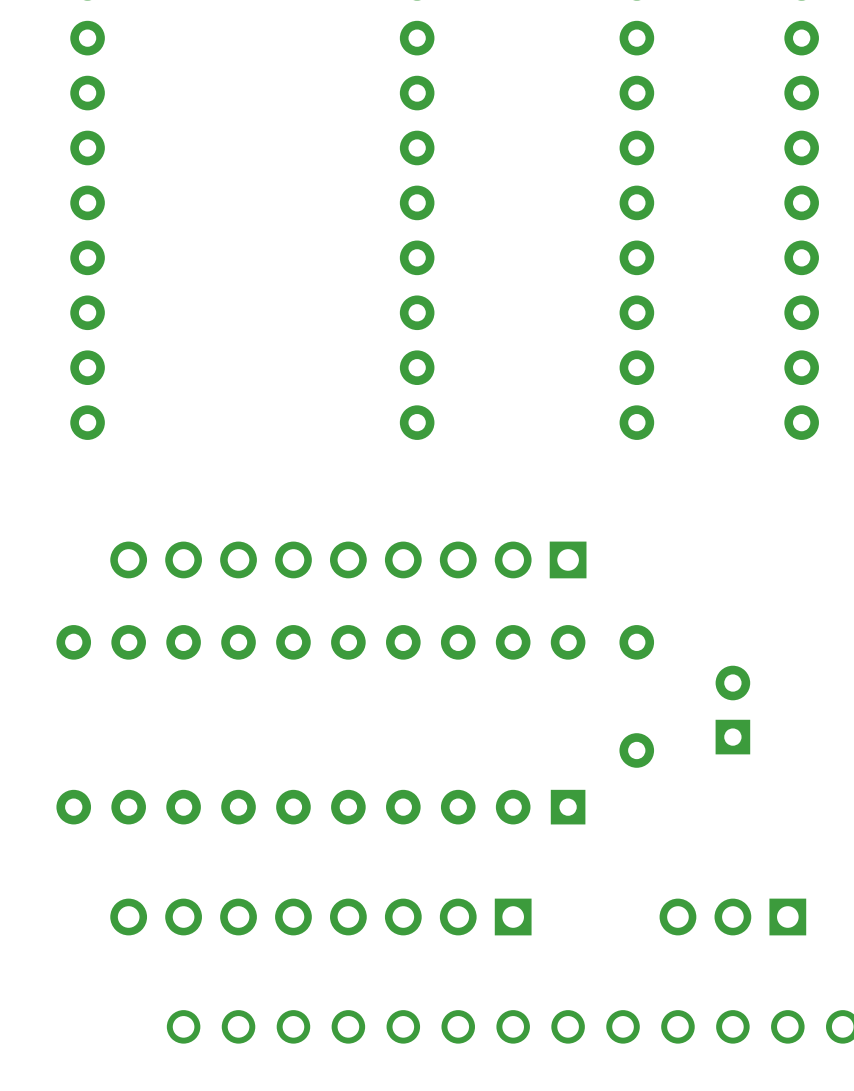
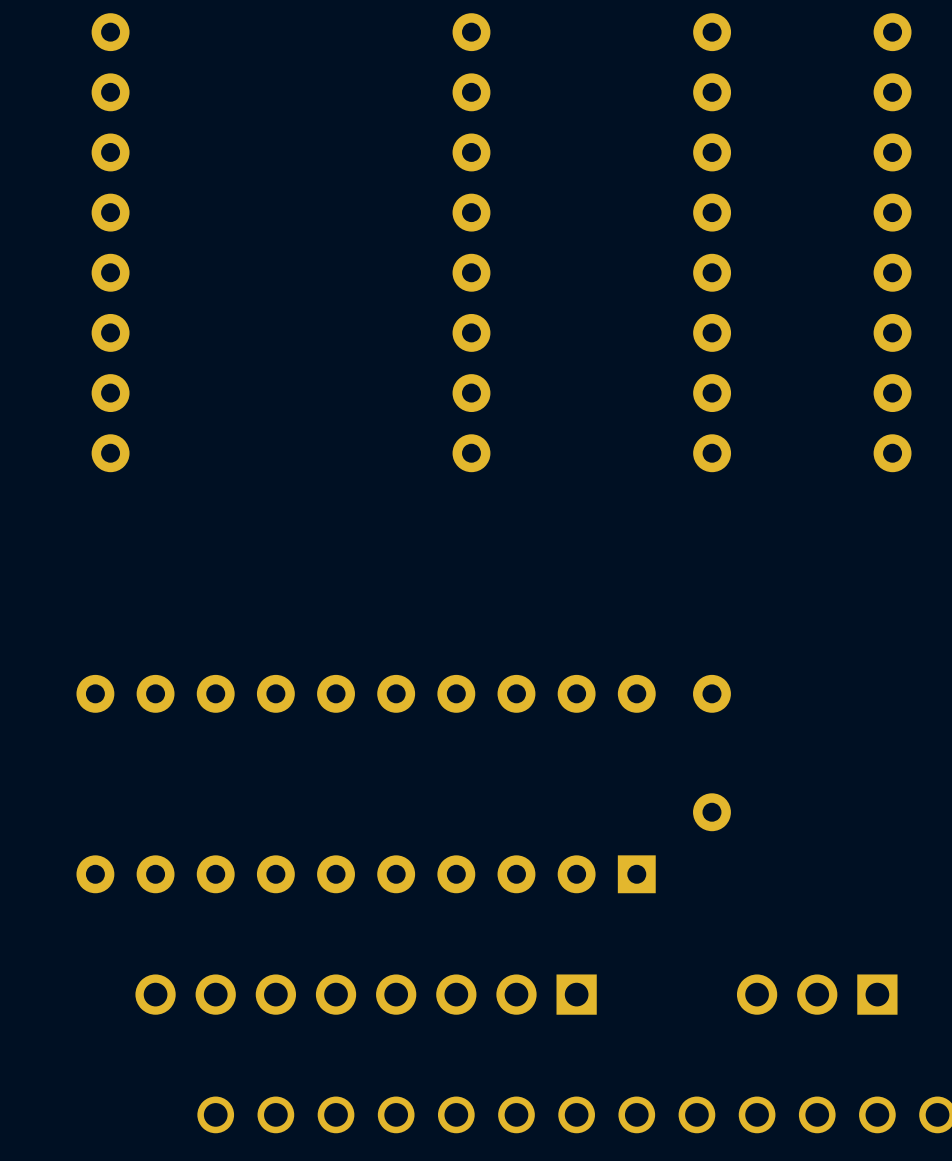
part: (348, 559) -> none
part: (732, 710) -> none

